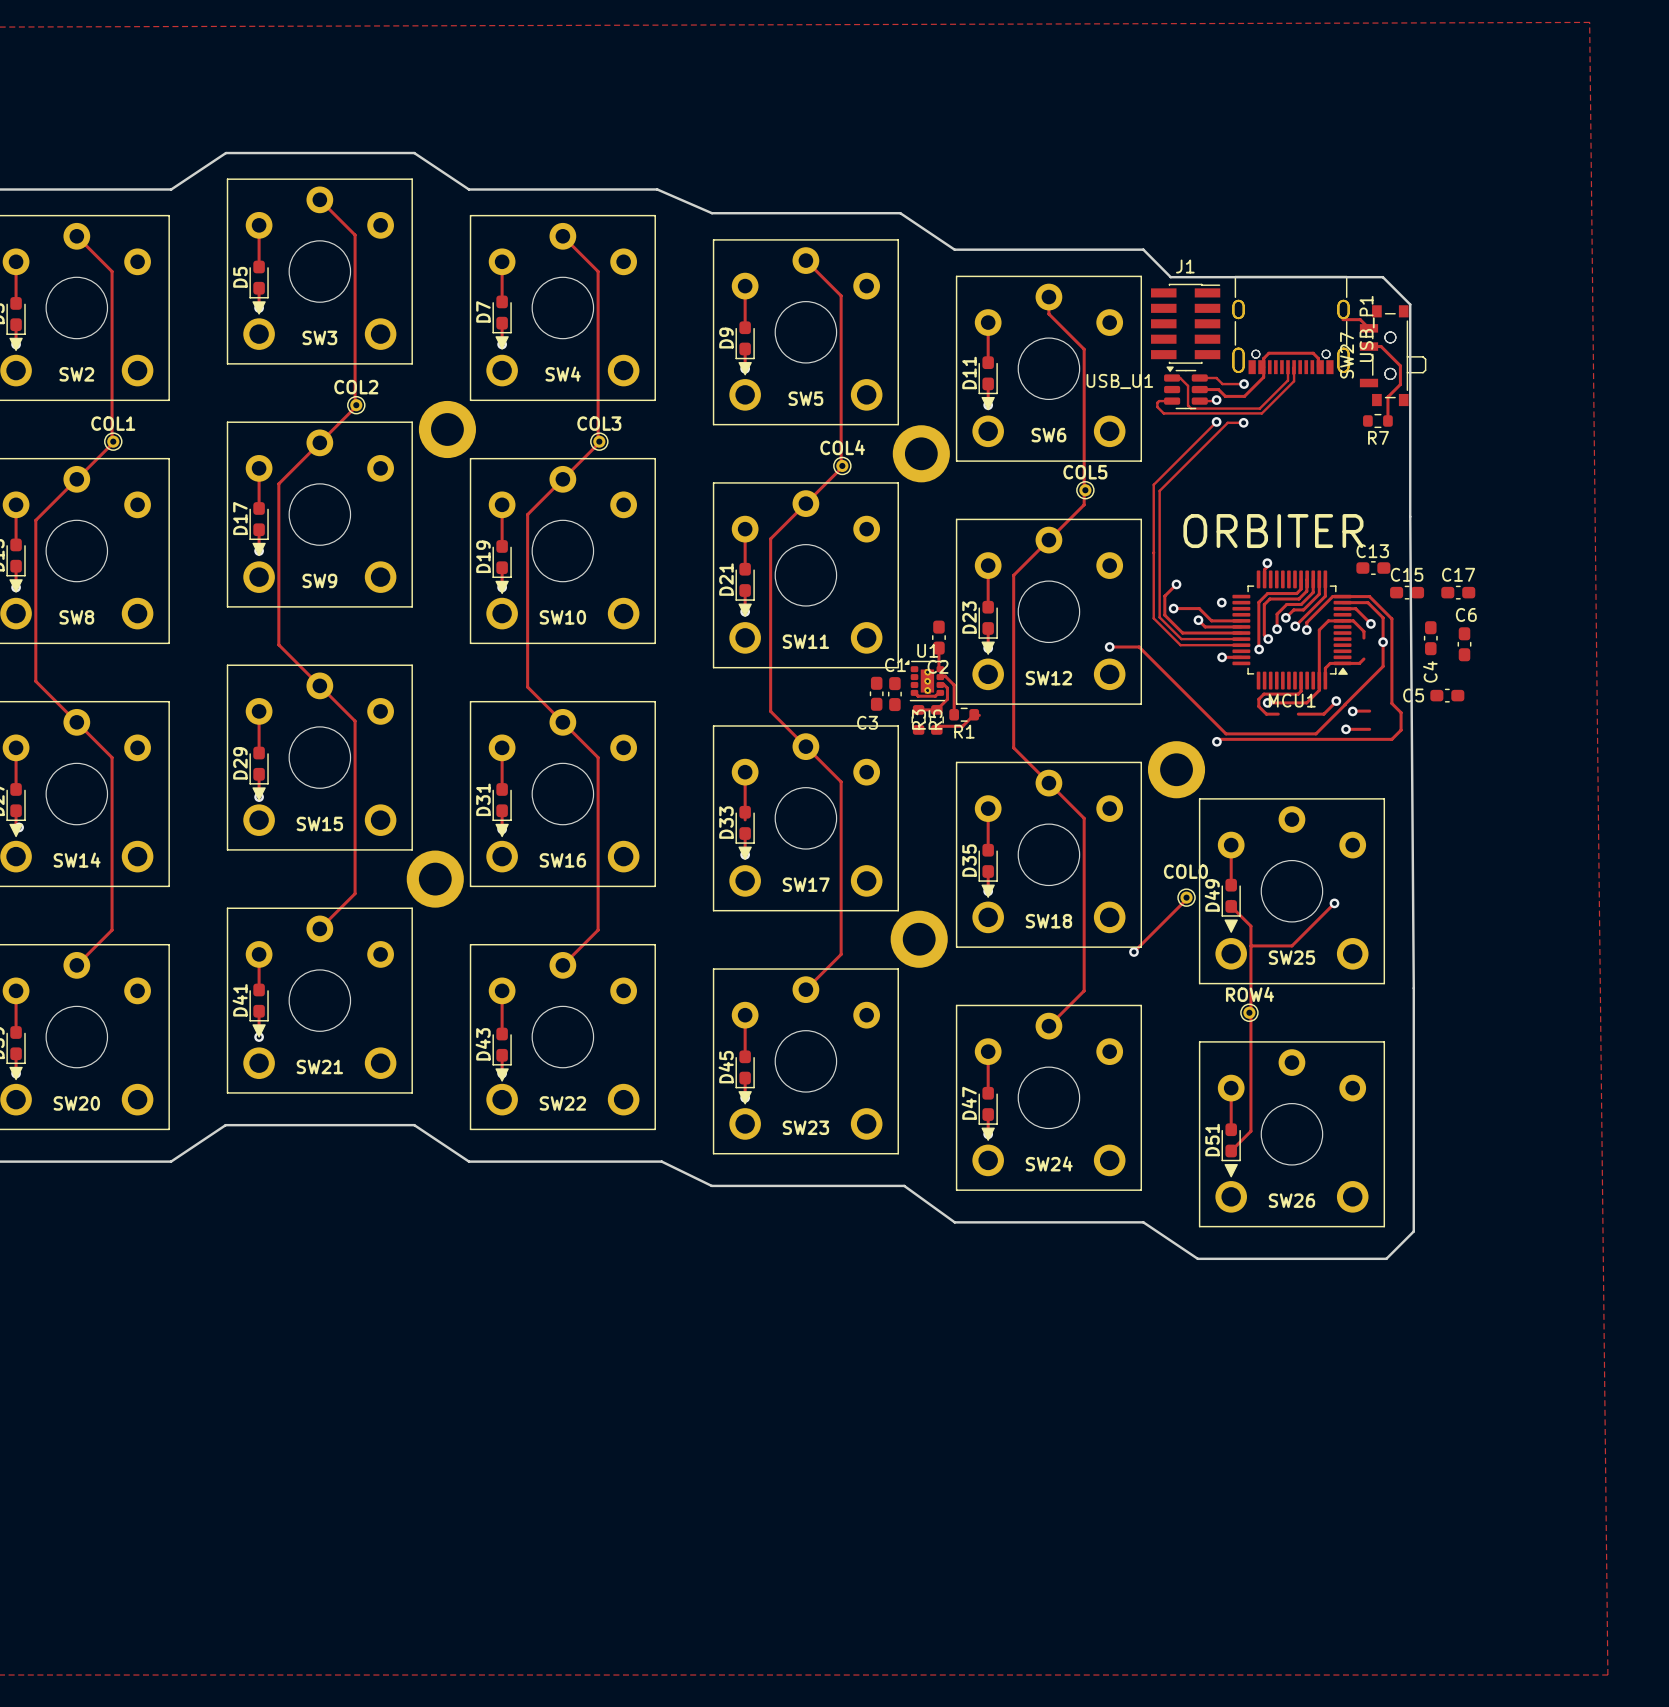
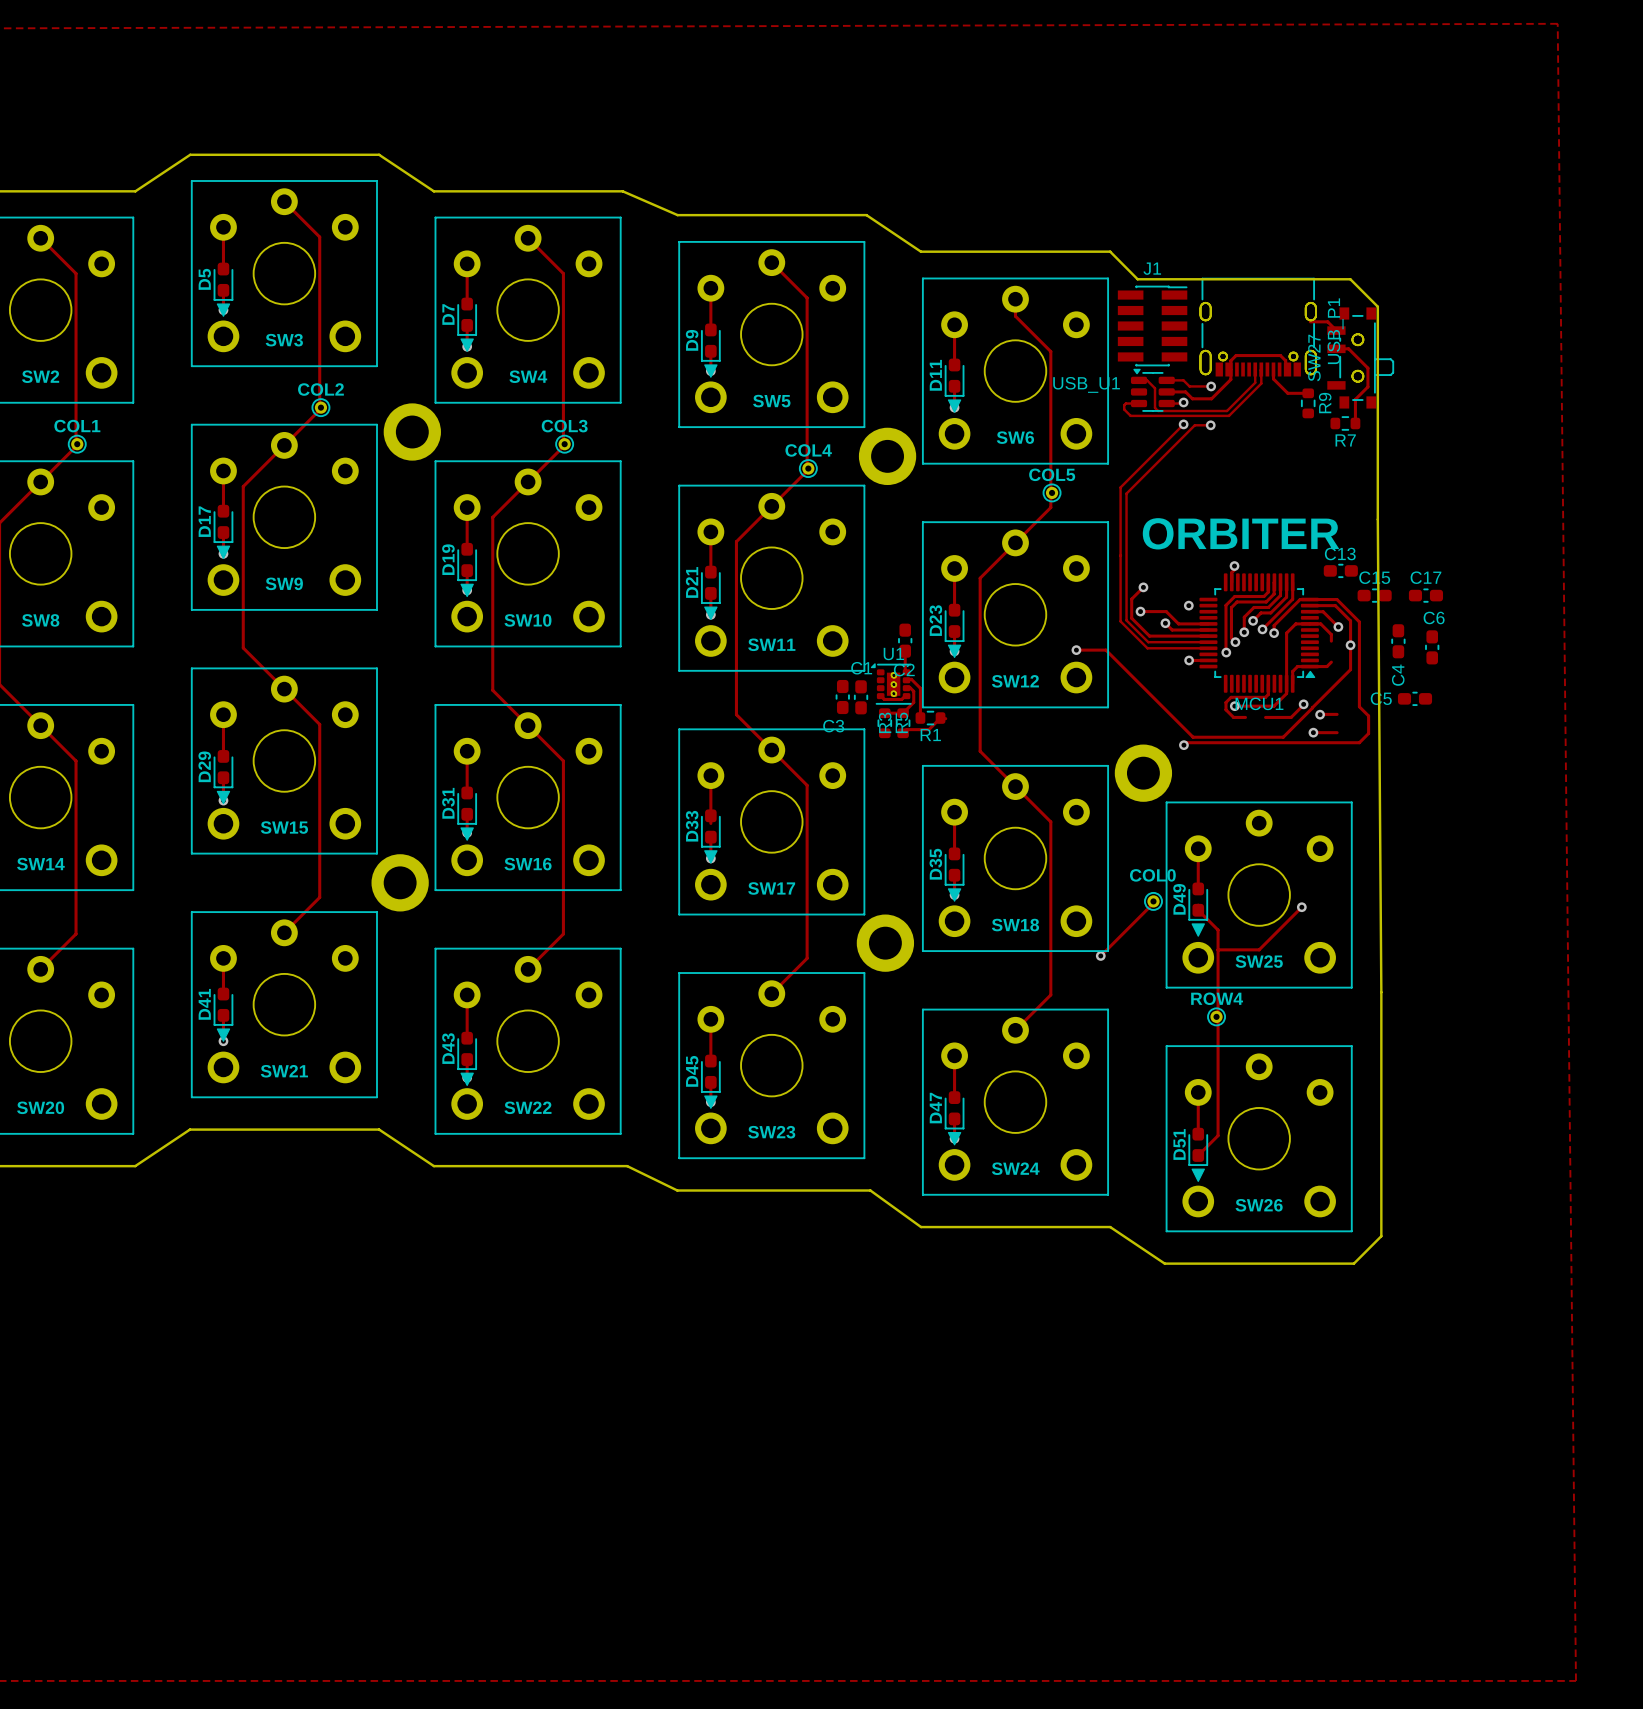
track: none -> (1273, 369) (1273, 379) (1287, 393) (1308, 393)
R9: none -> (1308, 403)

